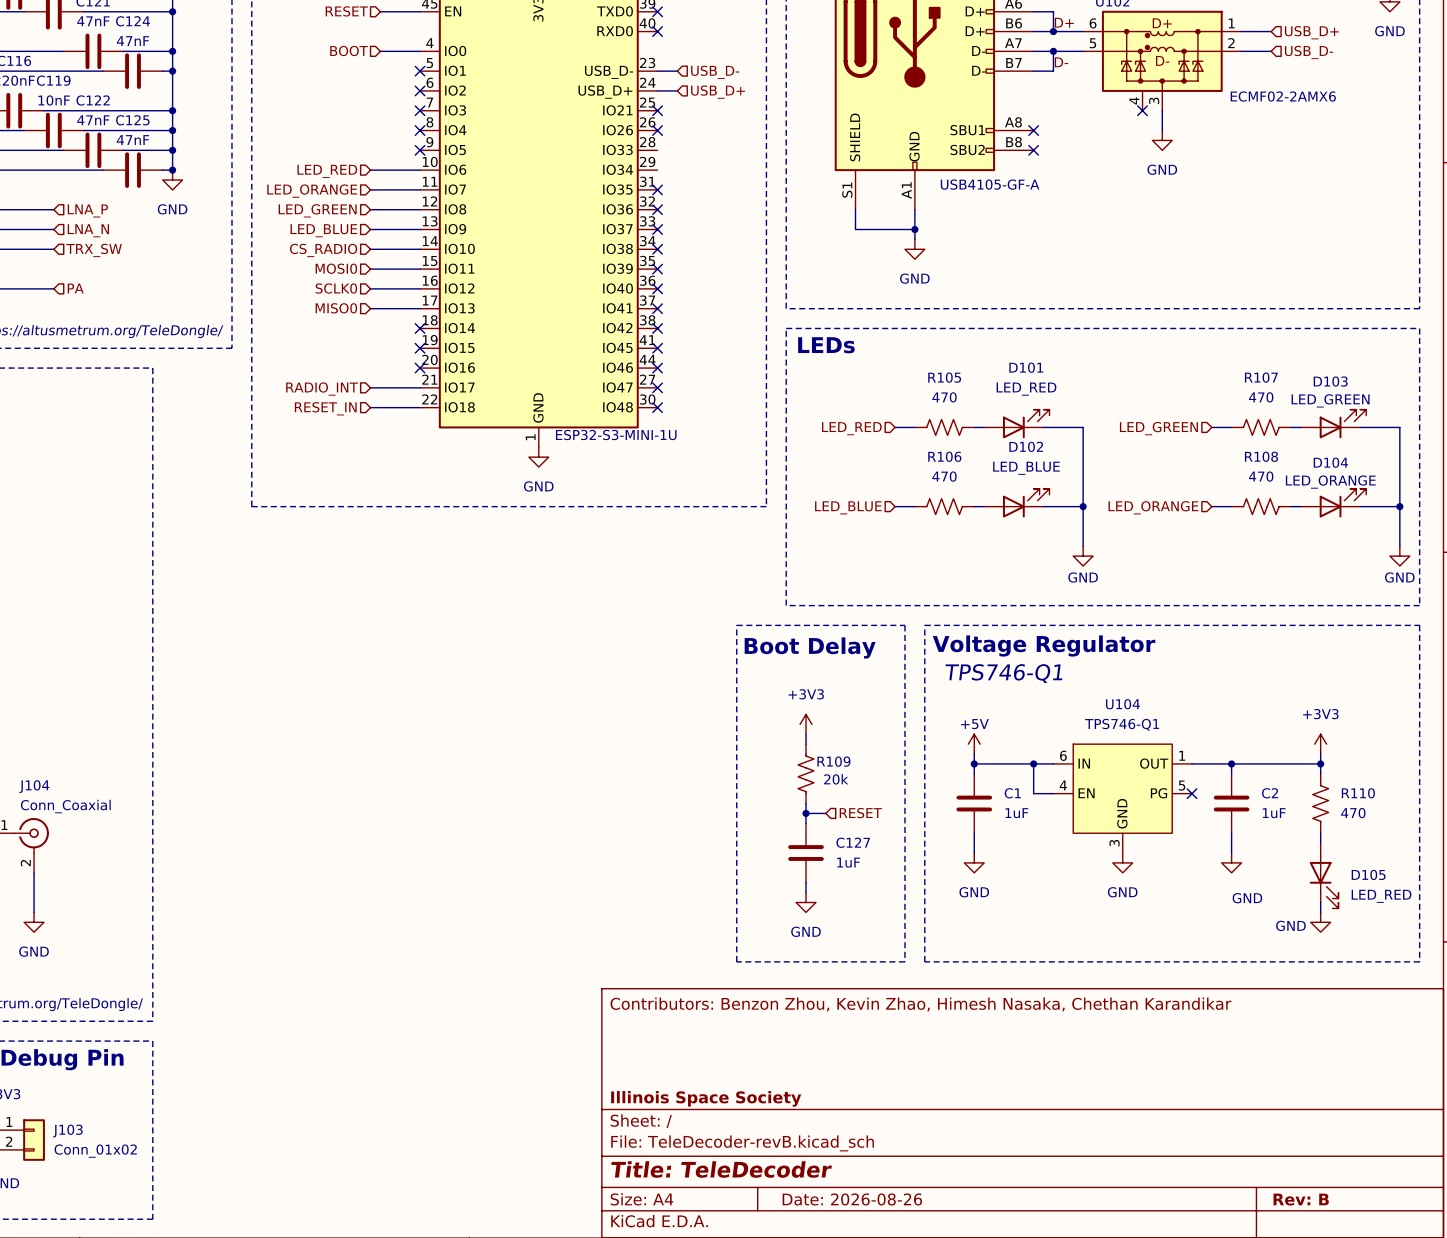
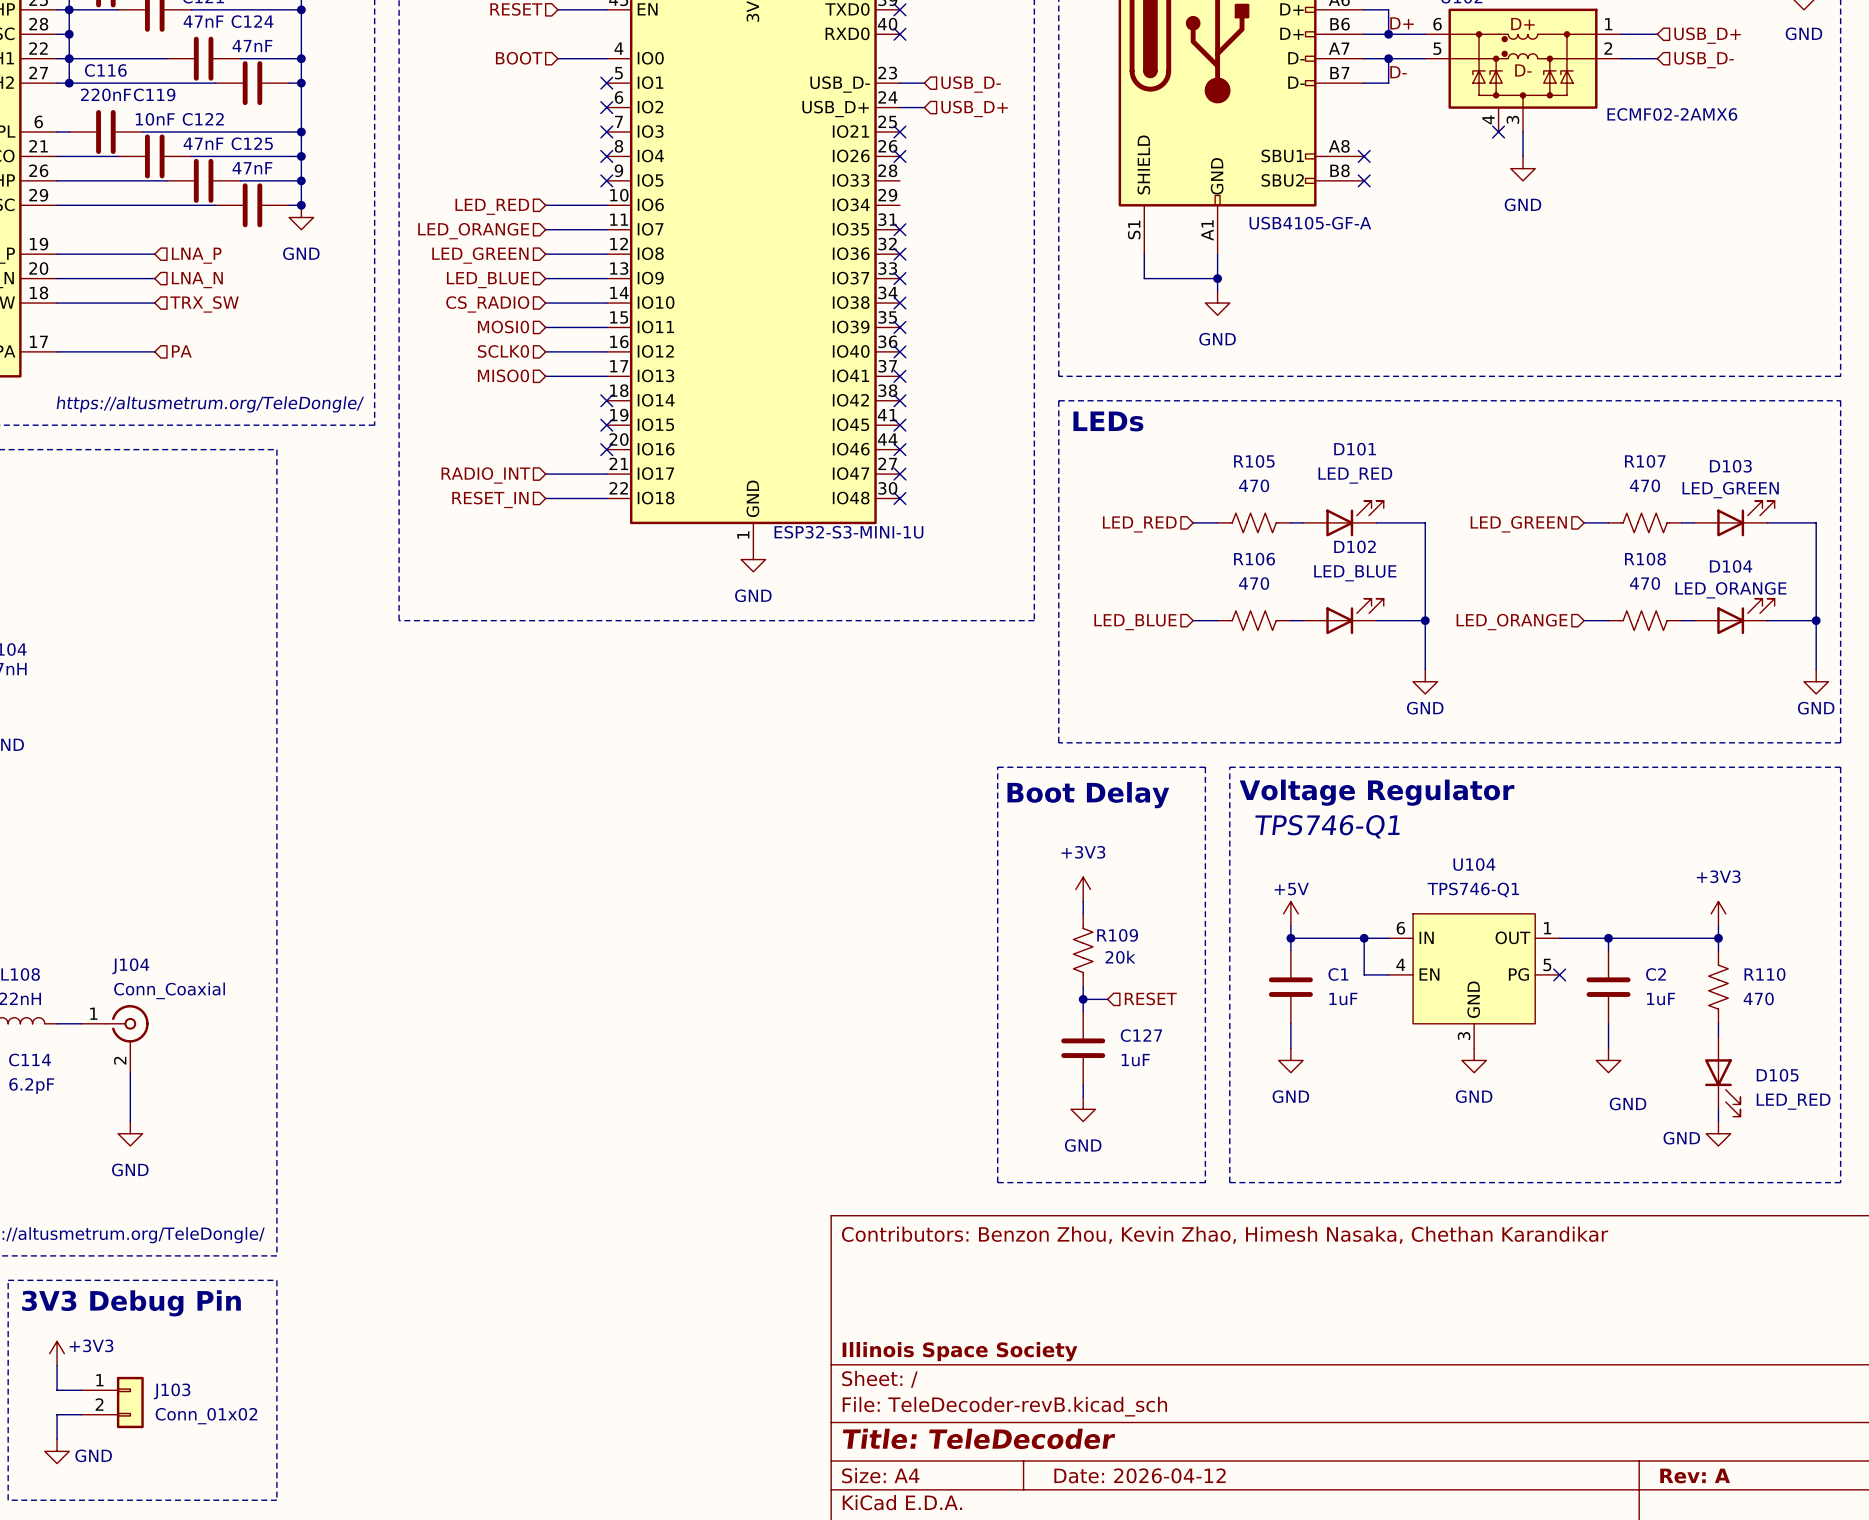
title block: Date: 2026-08-26 (852, 1199) -> Date: 2026-04-12 (1140, 1475)
title block: Rev: B (1301, 1199) -> Rev: A (1695, 1475)

